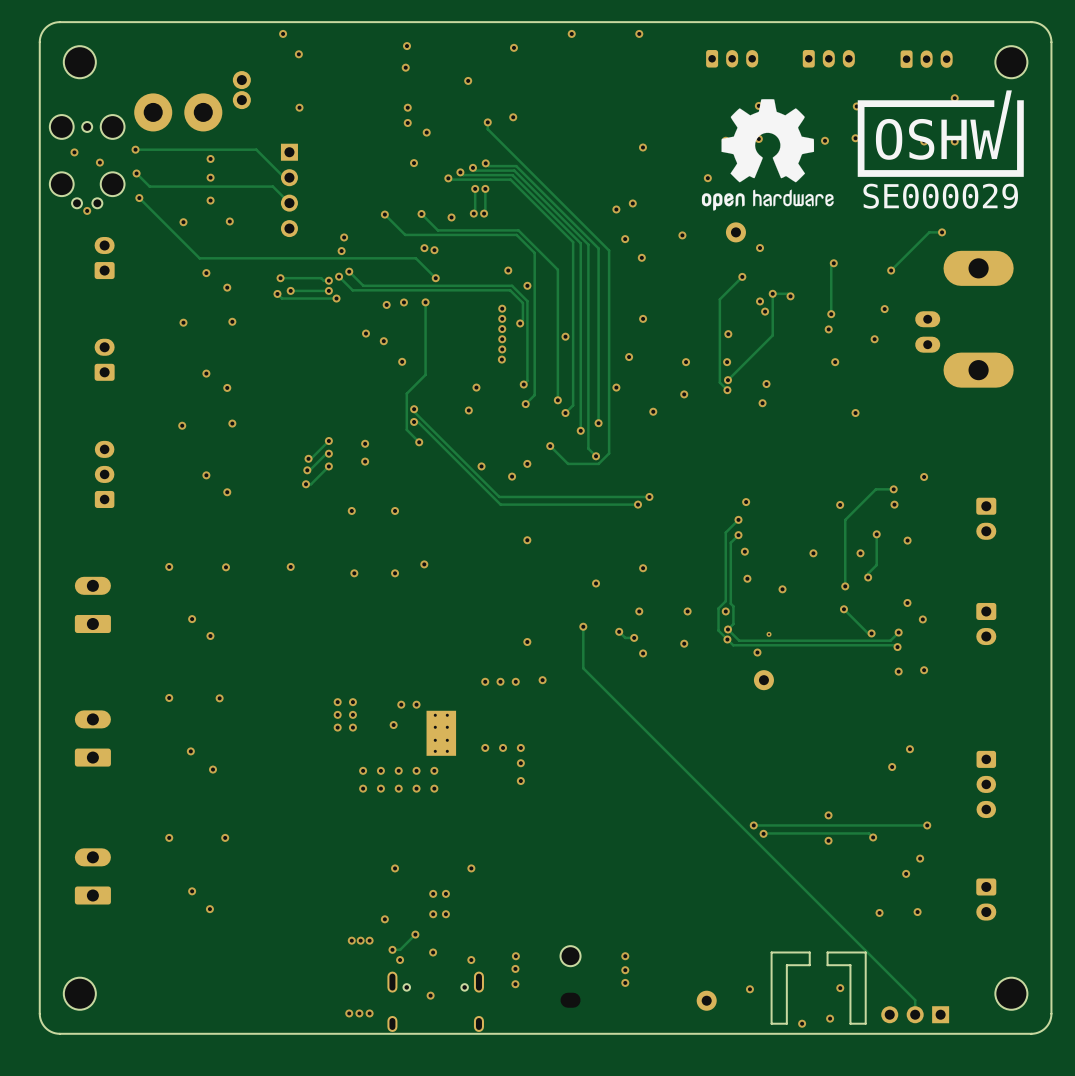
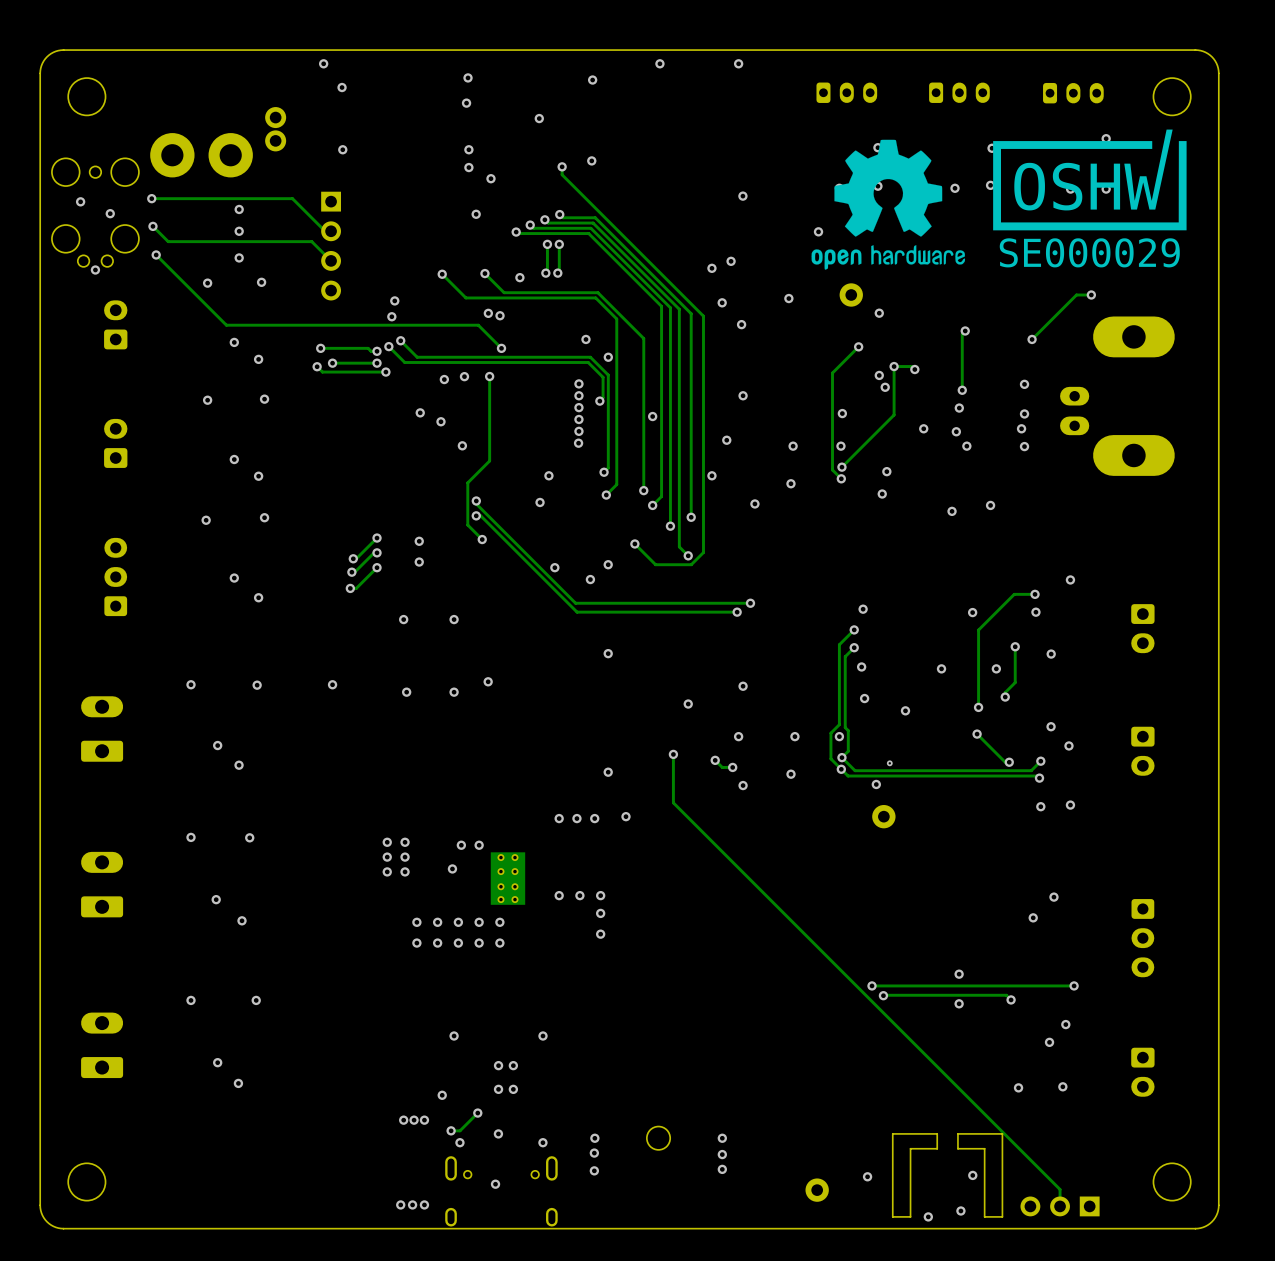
via: none -> (1024, 413)
via: (874, 339) -> none
via: none -> (923, 428)
via: none -> (1021, 428)
via: none -> (956, 431)
via: none -> (1024, 446)
via: none -> (952, 511)

